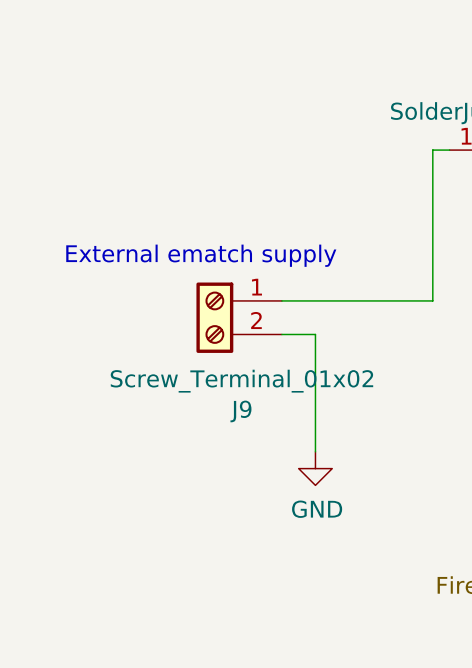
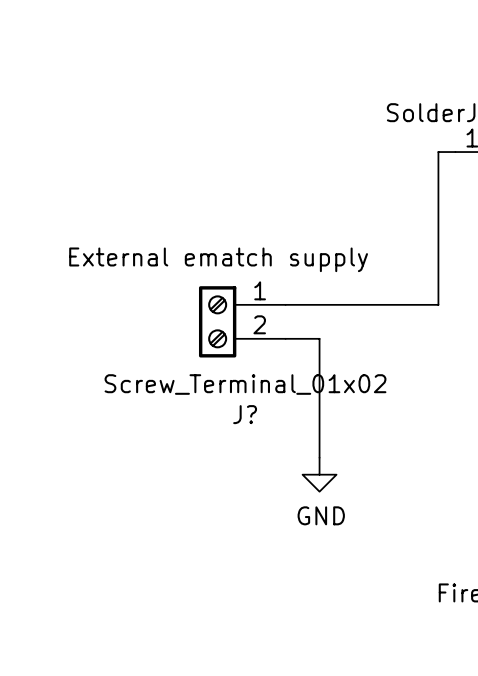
J9 name: J9 (240, 411) -> J? (245, 414)

